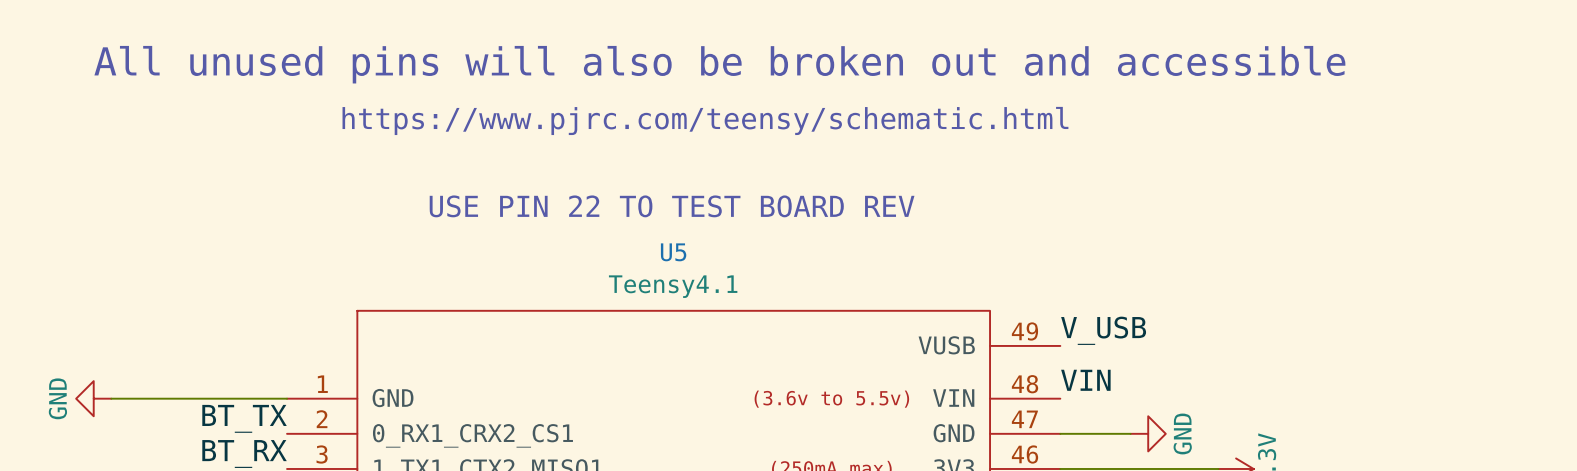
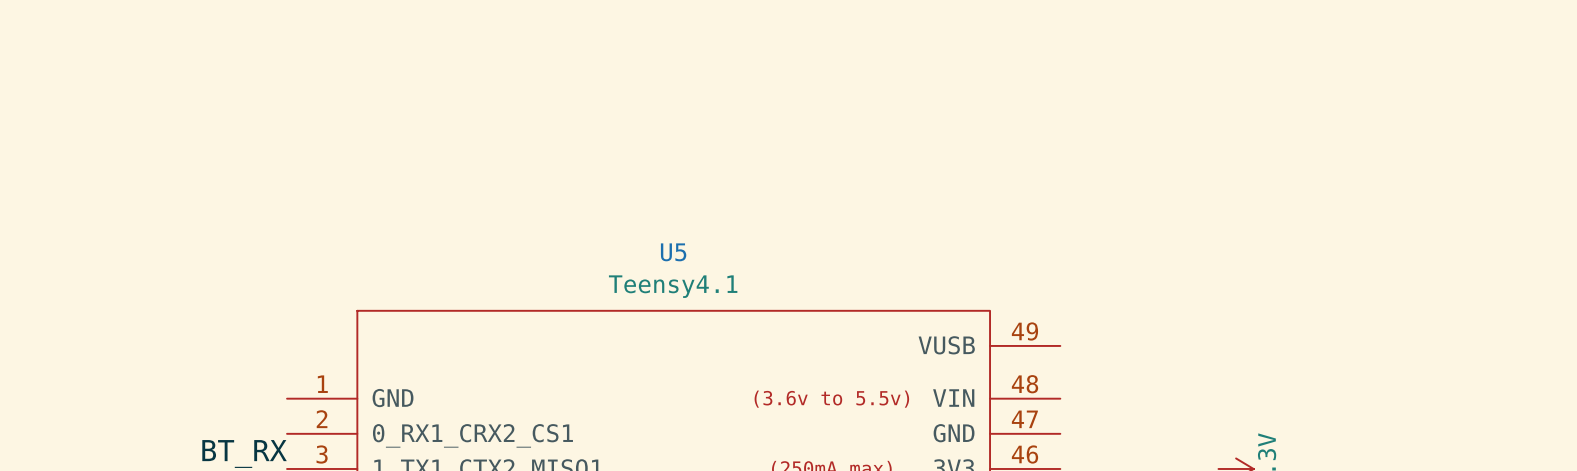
text: All unused pins will also be broken out and accessible (719, 64) -> none
text: https://www.pjrc.com/teensy/schematic.html (705, 120) -> none
text: USE PIN 22 TO TEST BOARD REV (672, 206) -> none
label: V_USB (1103, 330) -> none
label: VIN (1085, 380) -> none
power symbol: GND (93, 398) -> none
wire: (111, 398) (287, 398) -> none
label: BT_TX (244, 418) -> none
wire: (1060, 433) (1130, 433) -> none
power symbol: GND (1148, 433) -> none
wire: (1060, 468) (1218, 468) -> none

